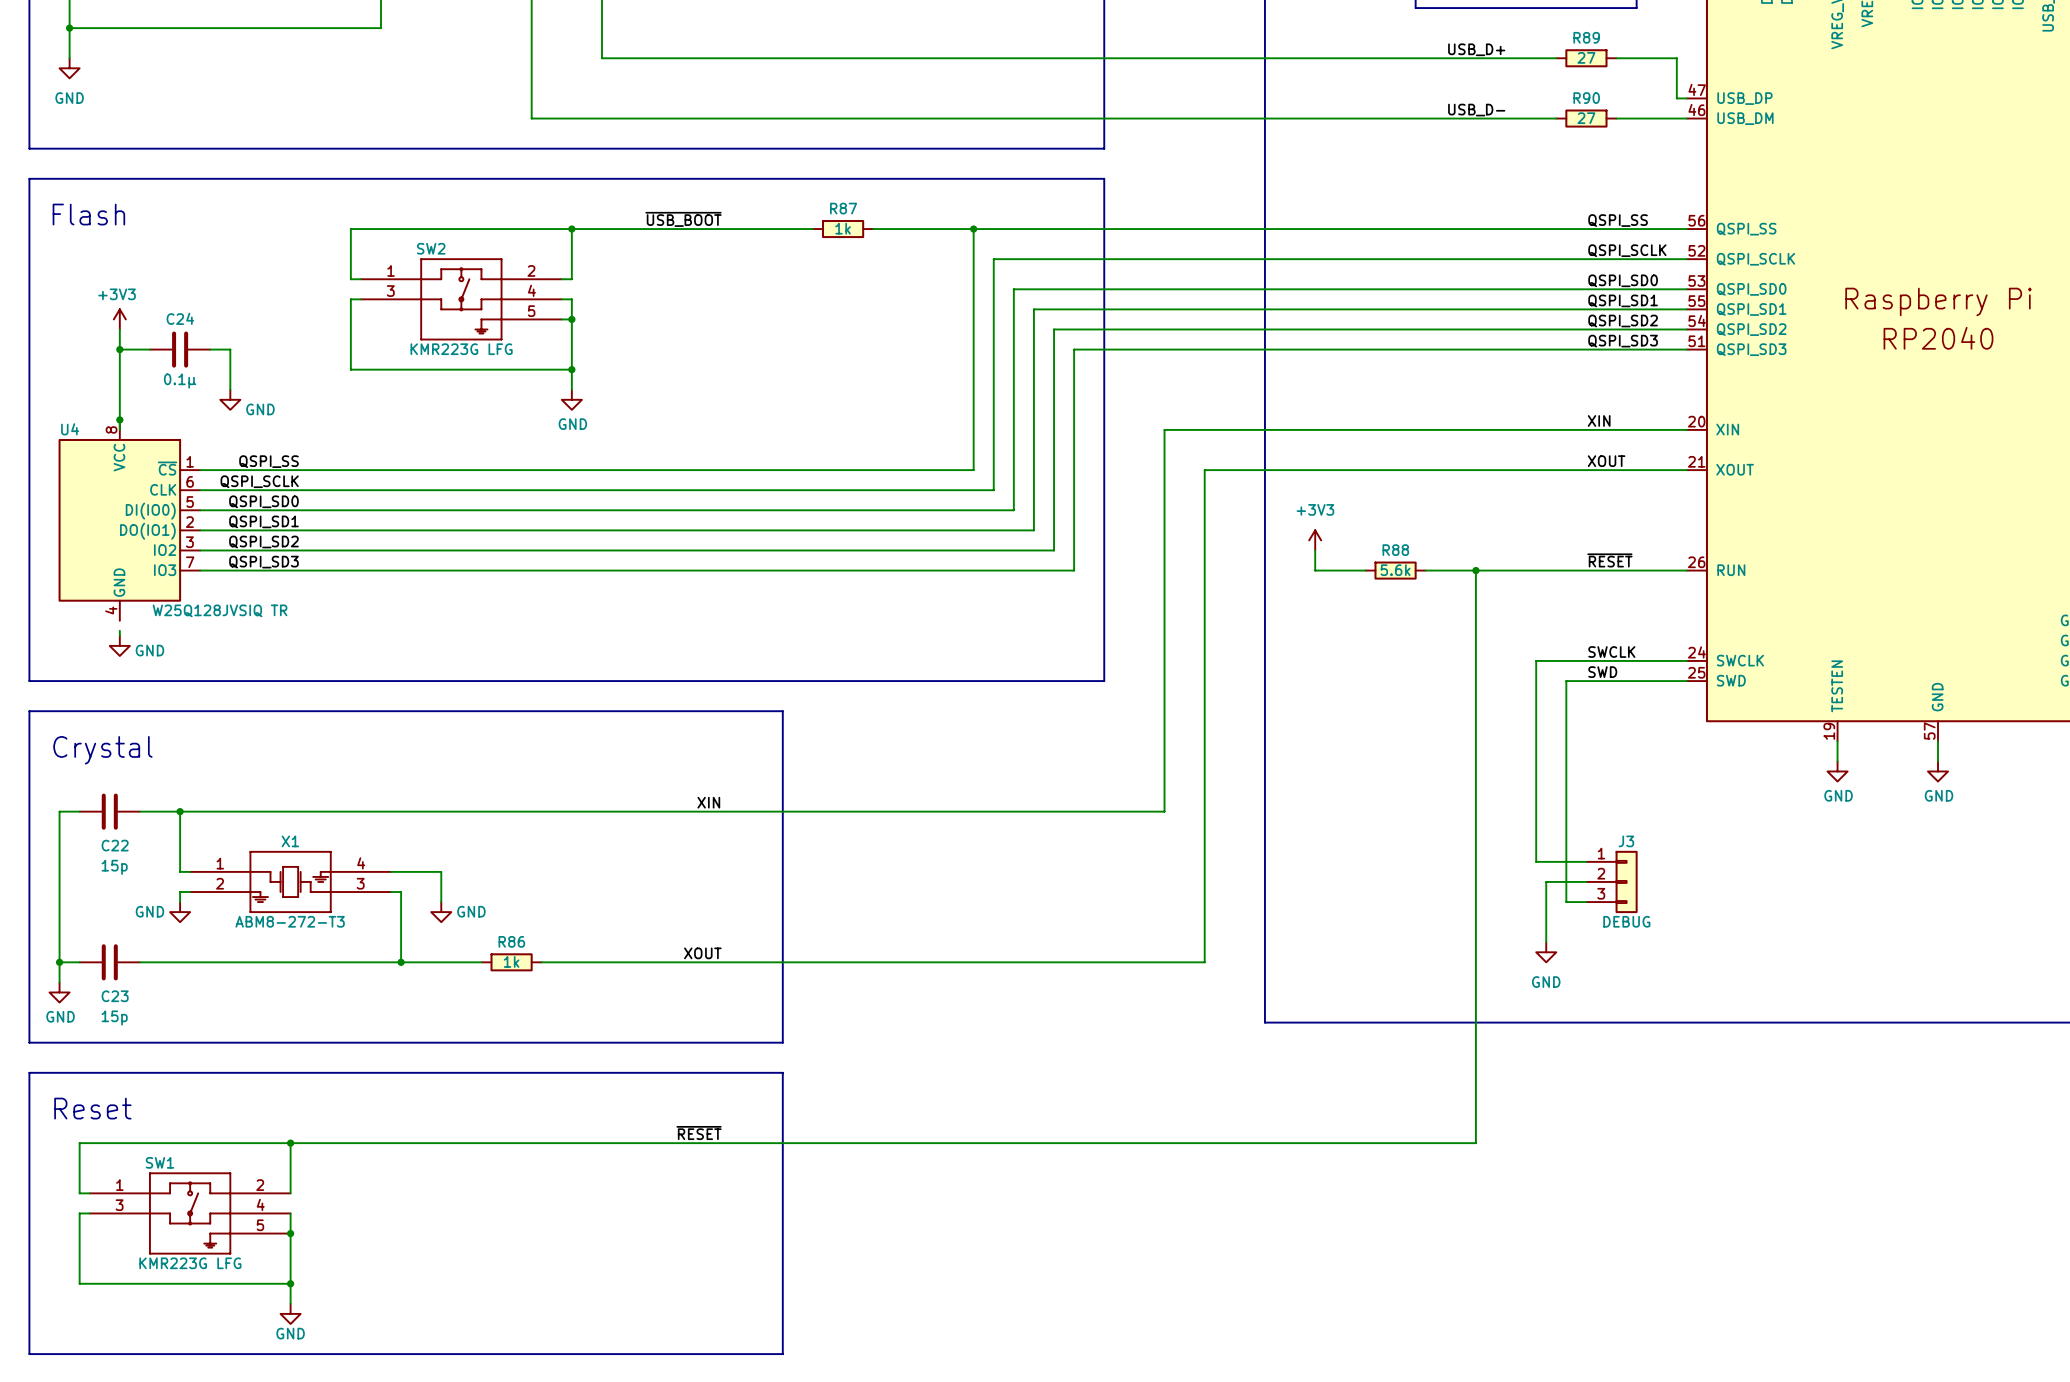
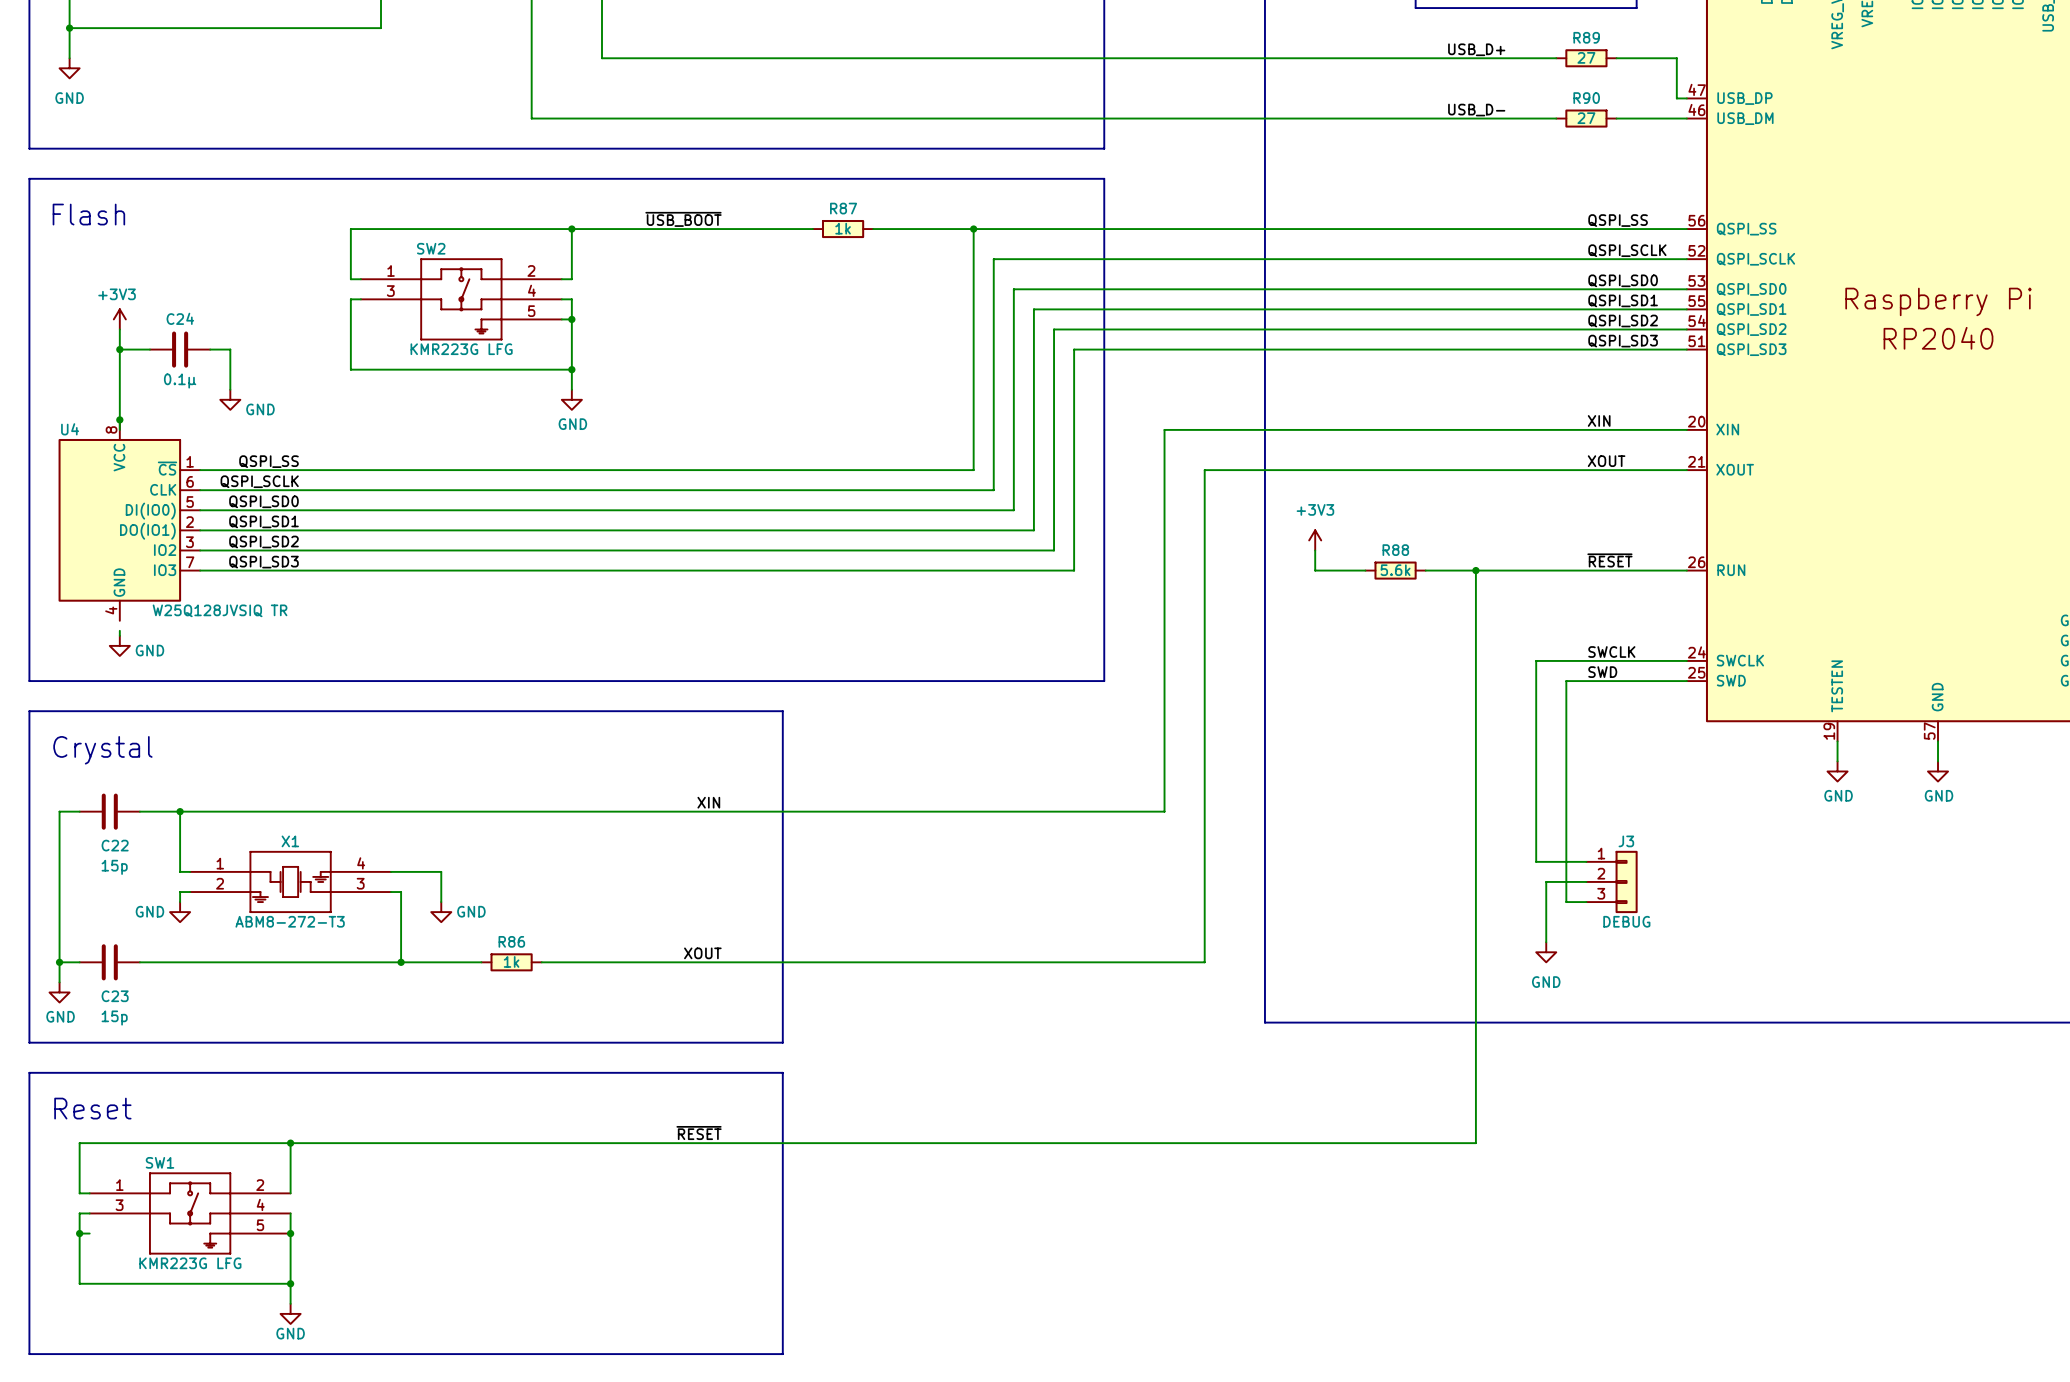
wire: none -> (79, 1233) (89, 1233)
junction: none -> (79, 1233)

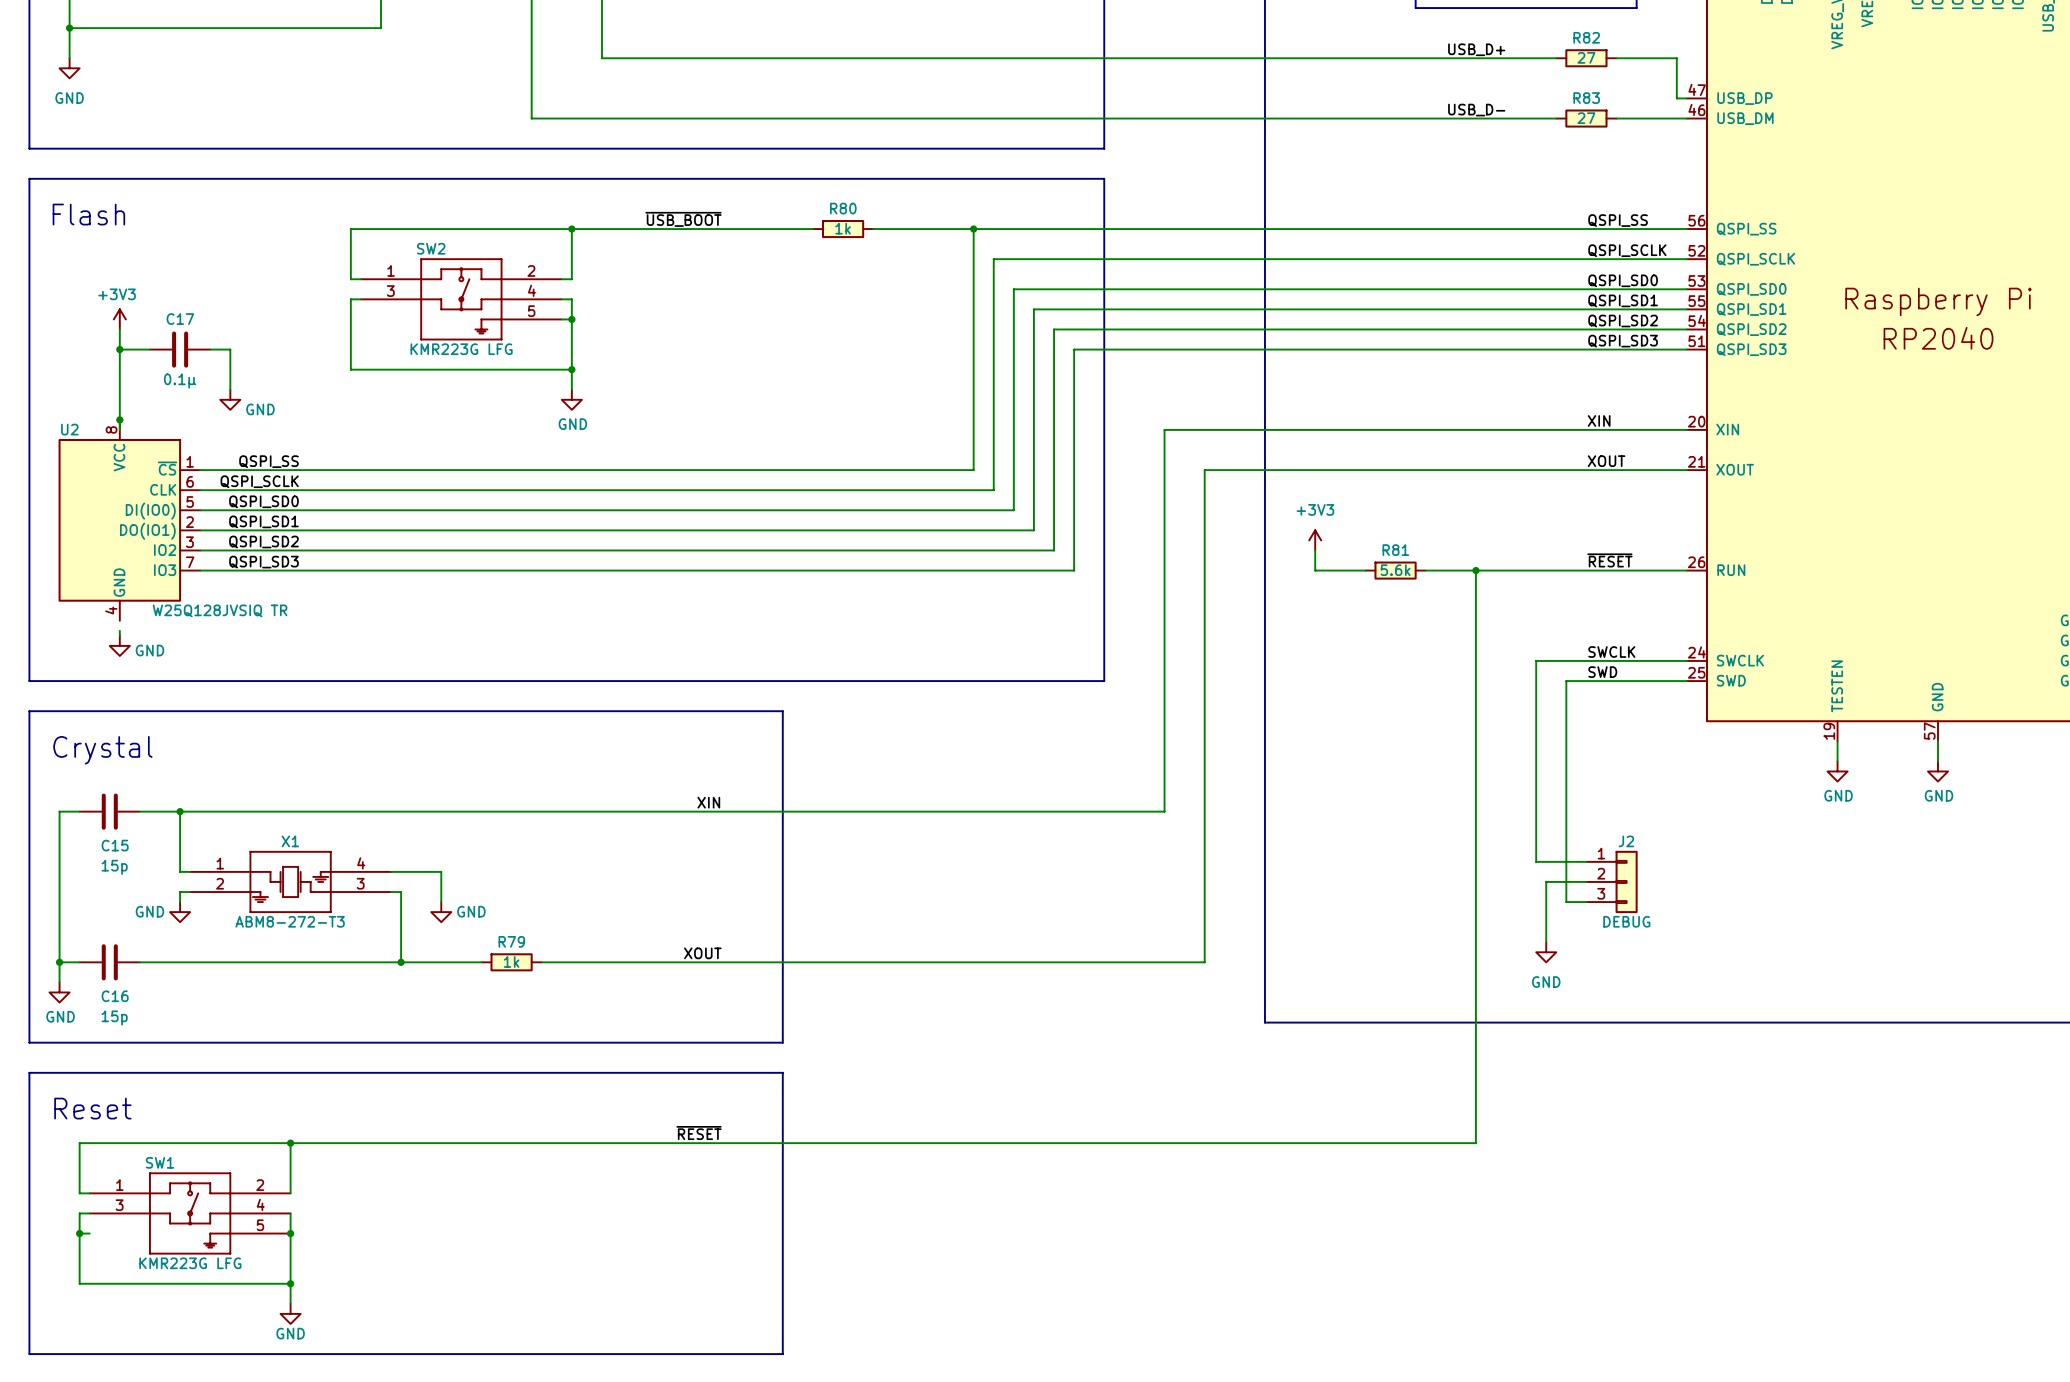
R89 name: R89 (1586, 37) -> R82 (1586, 37)
R90 name: R90 (1586, 98) -> R83 (1586, 98)
R87 name: R87 (843, 208) -> R80 (843, 208)
C24 name: C24 (180, 318) -> C17 (180, 319)
U4 name: U4 (70, 429) -> U2 (69, 429)
R88 name: R88 (1395, 550) -> R81 (1395, 550)
J3 name: J3 (1626, 841) -> J2 (1626, 841)
C22 name: C22 (115, 845) -> C15 (115, 845)
R86 name: R86 (511, 941) -> R79 (511, 941)
C23 name: C23 (115, 996) -> C16 (115, 996)

